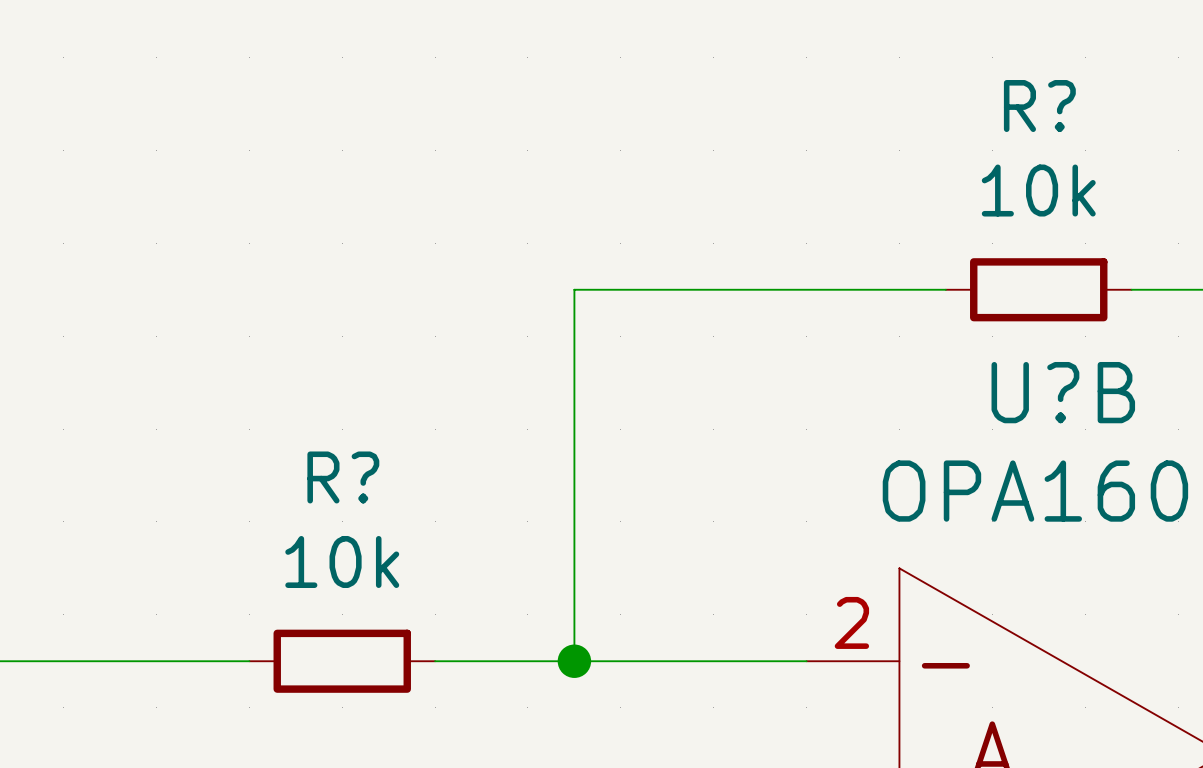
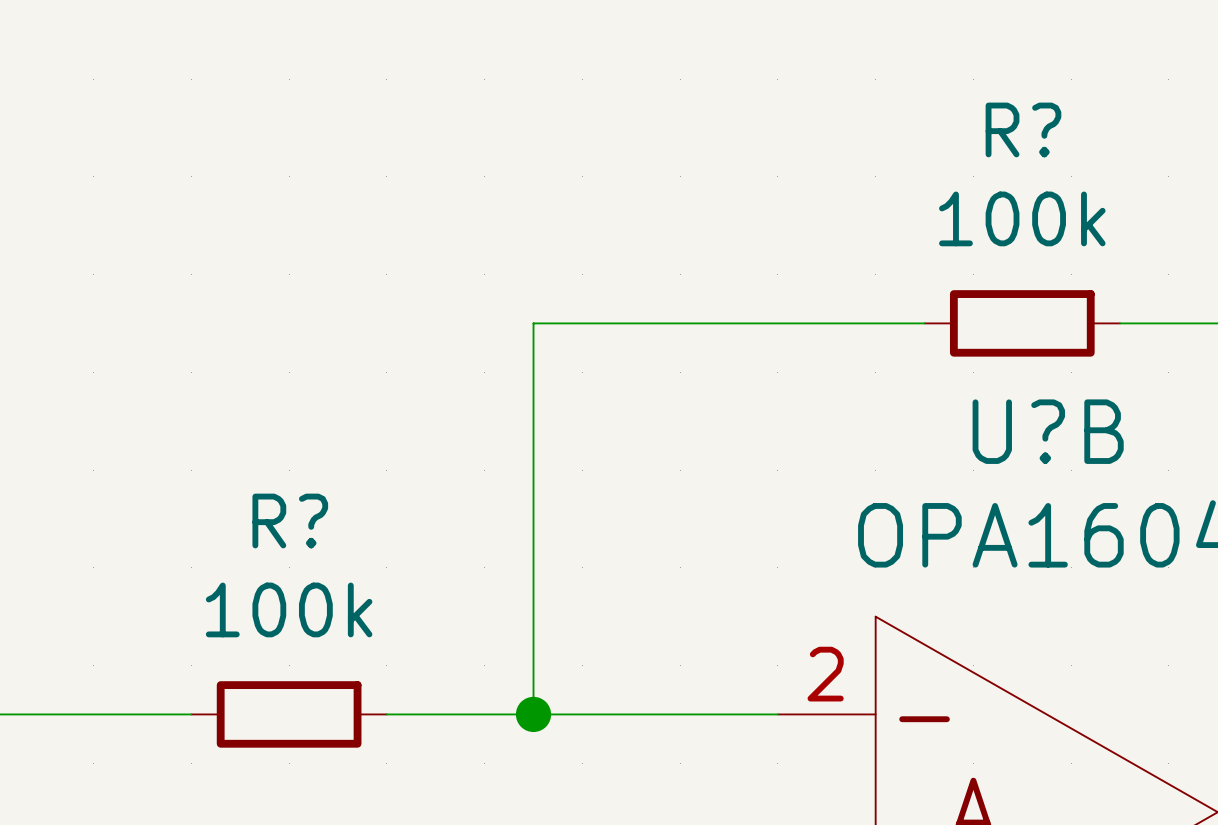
R? value: 10k (1038, 190) -> 100k (1022, 218)
R? value: 10k (342, 561) -> 100k (289, 609)

